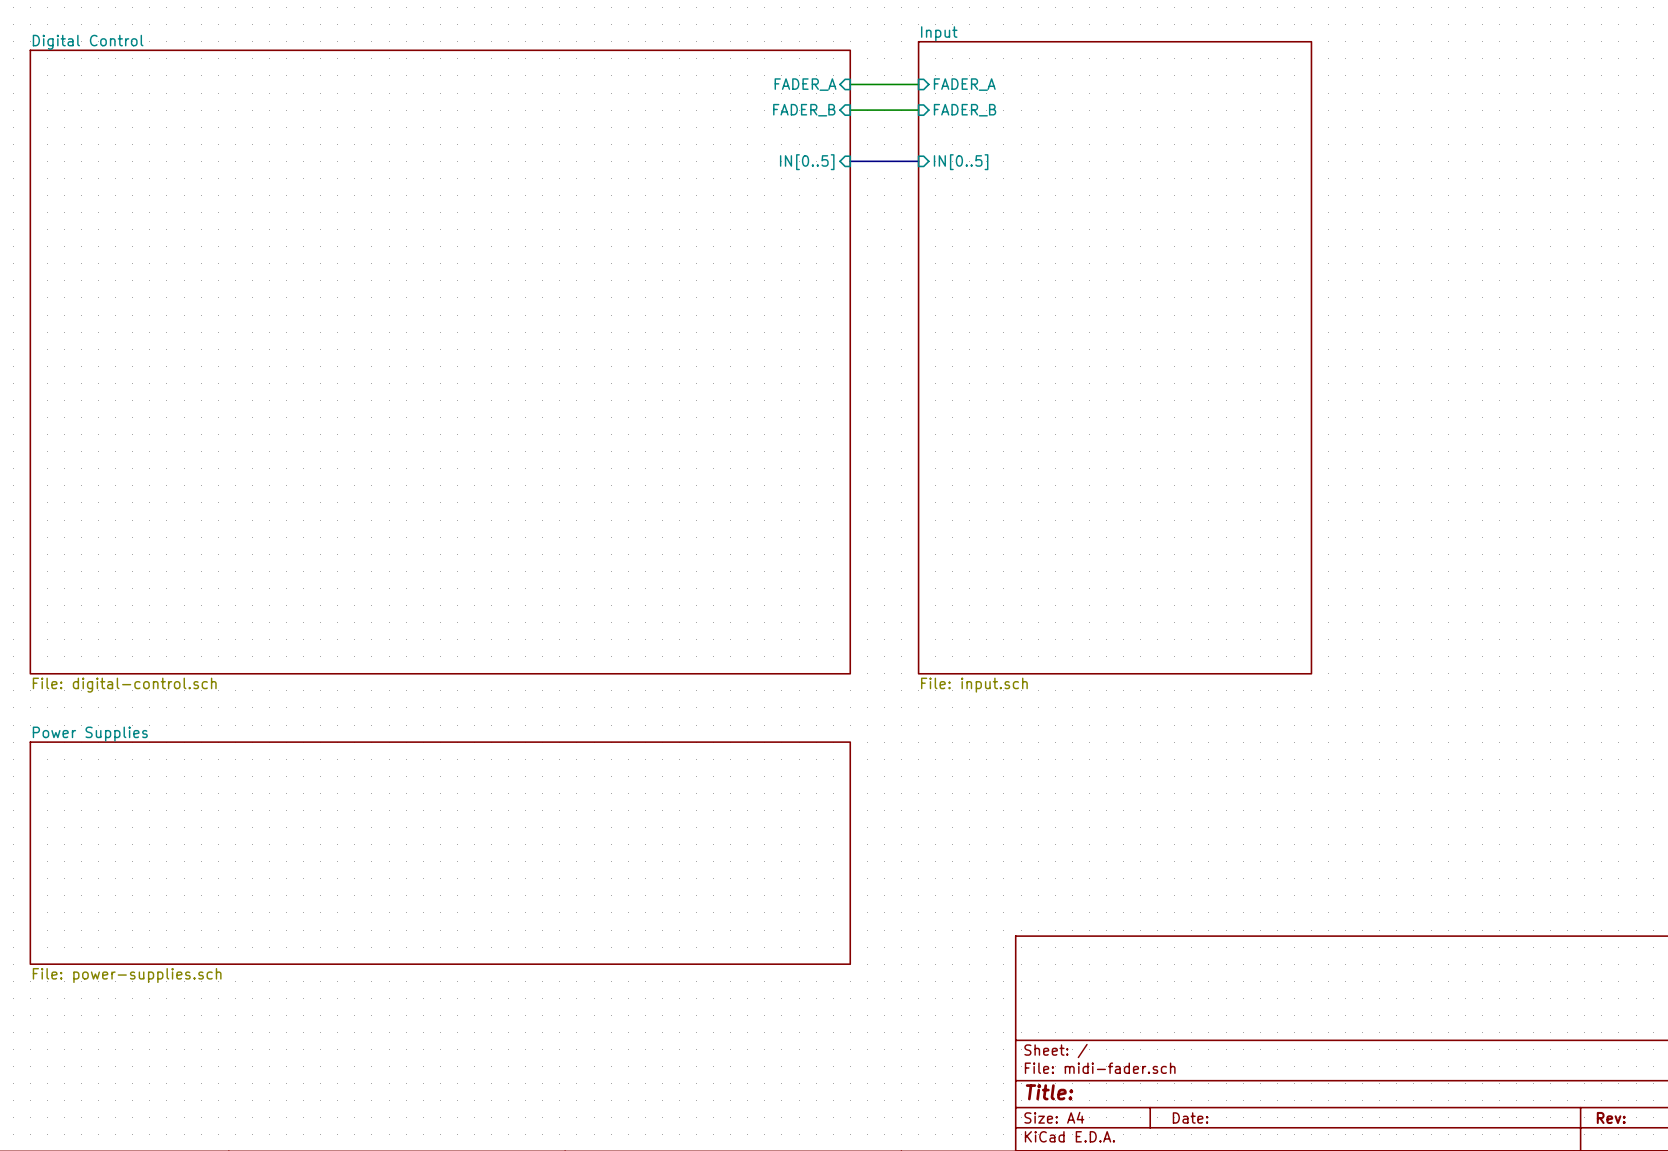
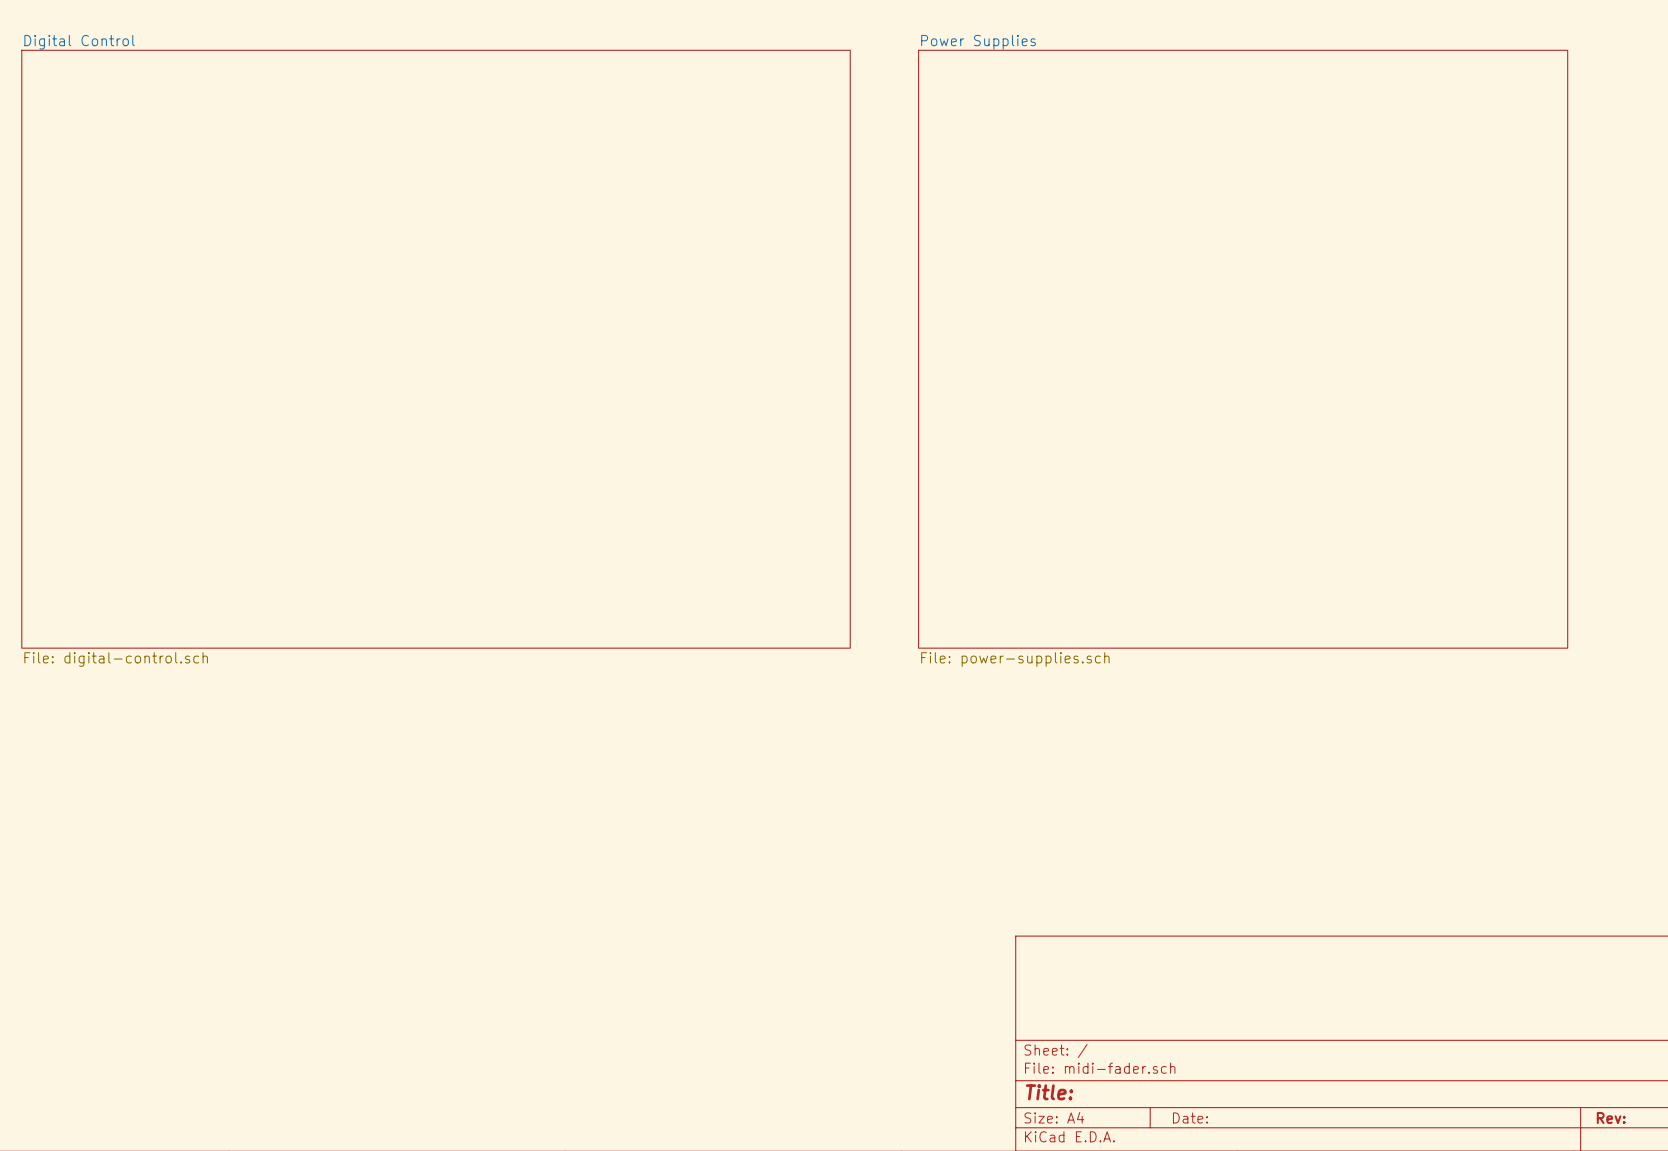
sheet pin: FADER_A (805, 84) -> none
wire: (850, 84) (918, 84) -> none
sheet pin: FADER_A (964, 84) -> none
sheet pin: FADER_B (804, 110) -> none
wire: (850, 110) (918, 110) -> none
sheet pin: FADER_B (965, 110) -> none
bus: (850, 161) (918, 161) -> none
sheet pin: IN[0..5] (807, 162) -> none
sheet pin: IN[0..5] (961, 162) -> none
sheet Digital Control: none -> File: digital-control.sch (436, 349)
sheet Power Supplies: none -> File: power-supplies.sch (1243, 349)
sheet Input: File: input.sch (1115, 357) -> none
sheet Digital Control: File: digital-control.sch (440, 362) -> none
sheet Power Supplies: File: power-supplies.sch (440, 853) -> none

